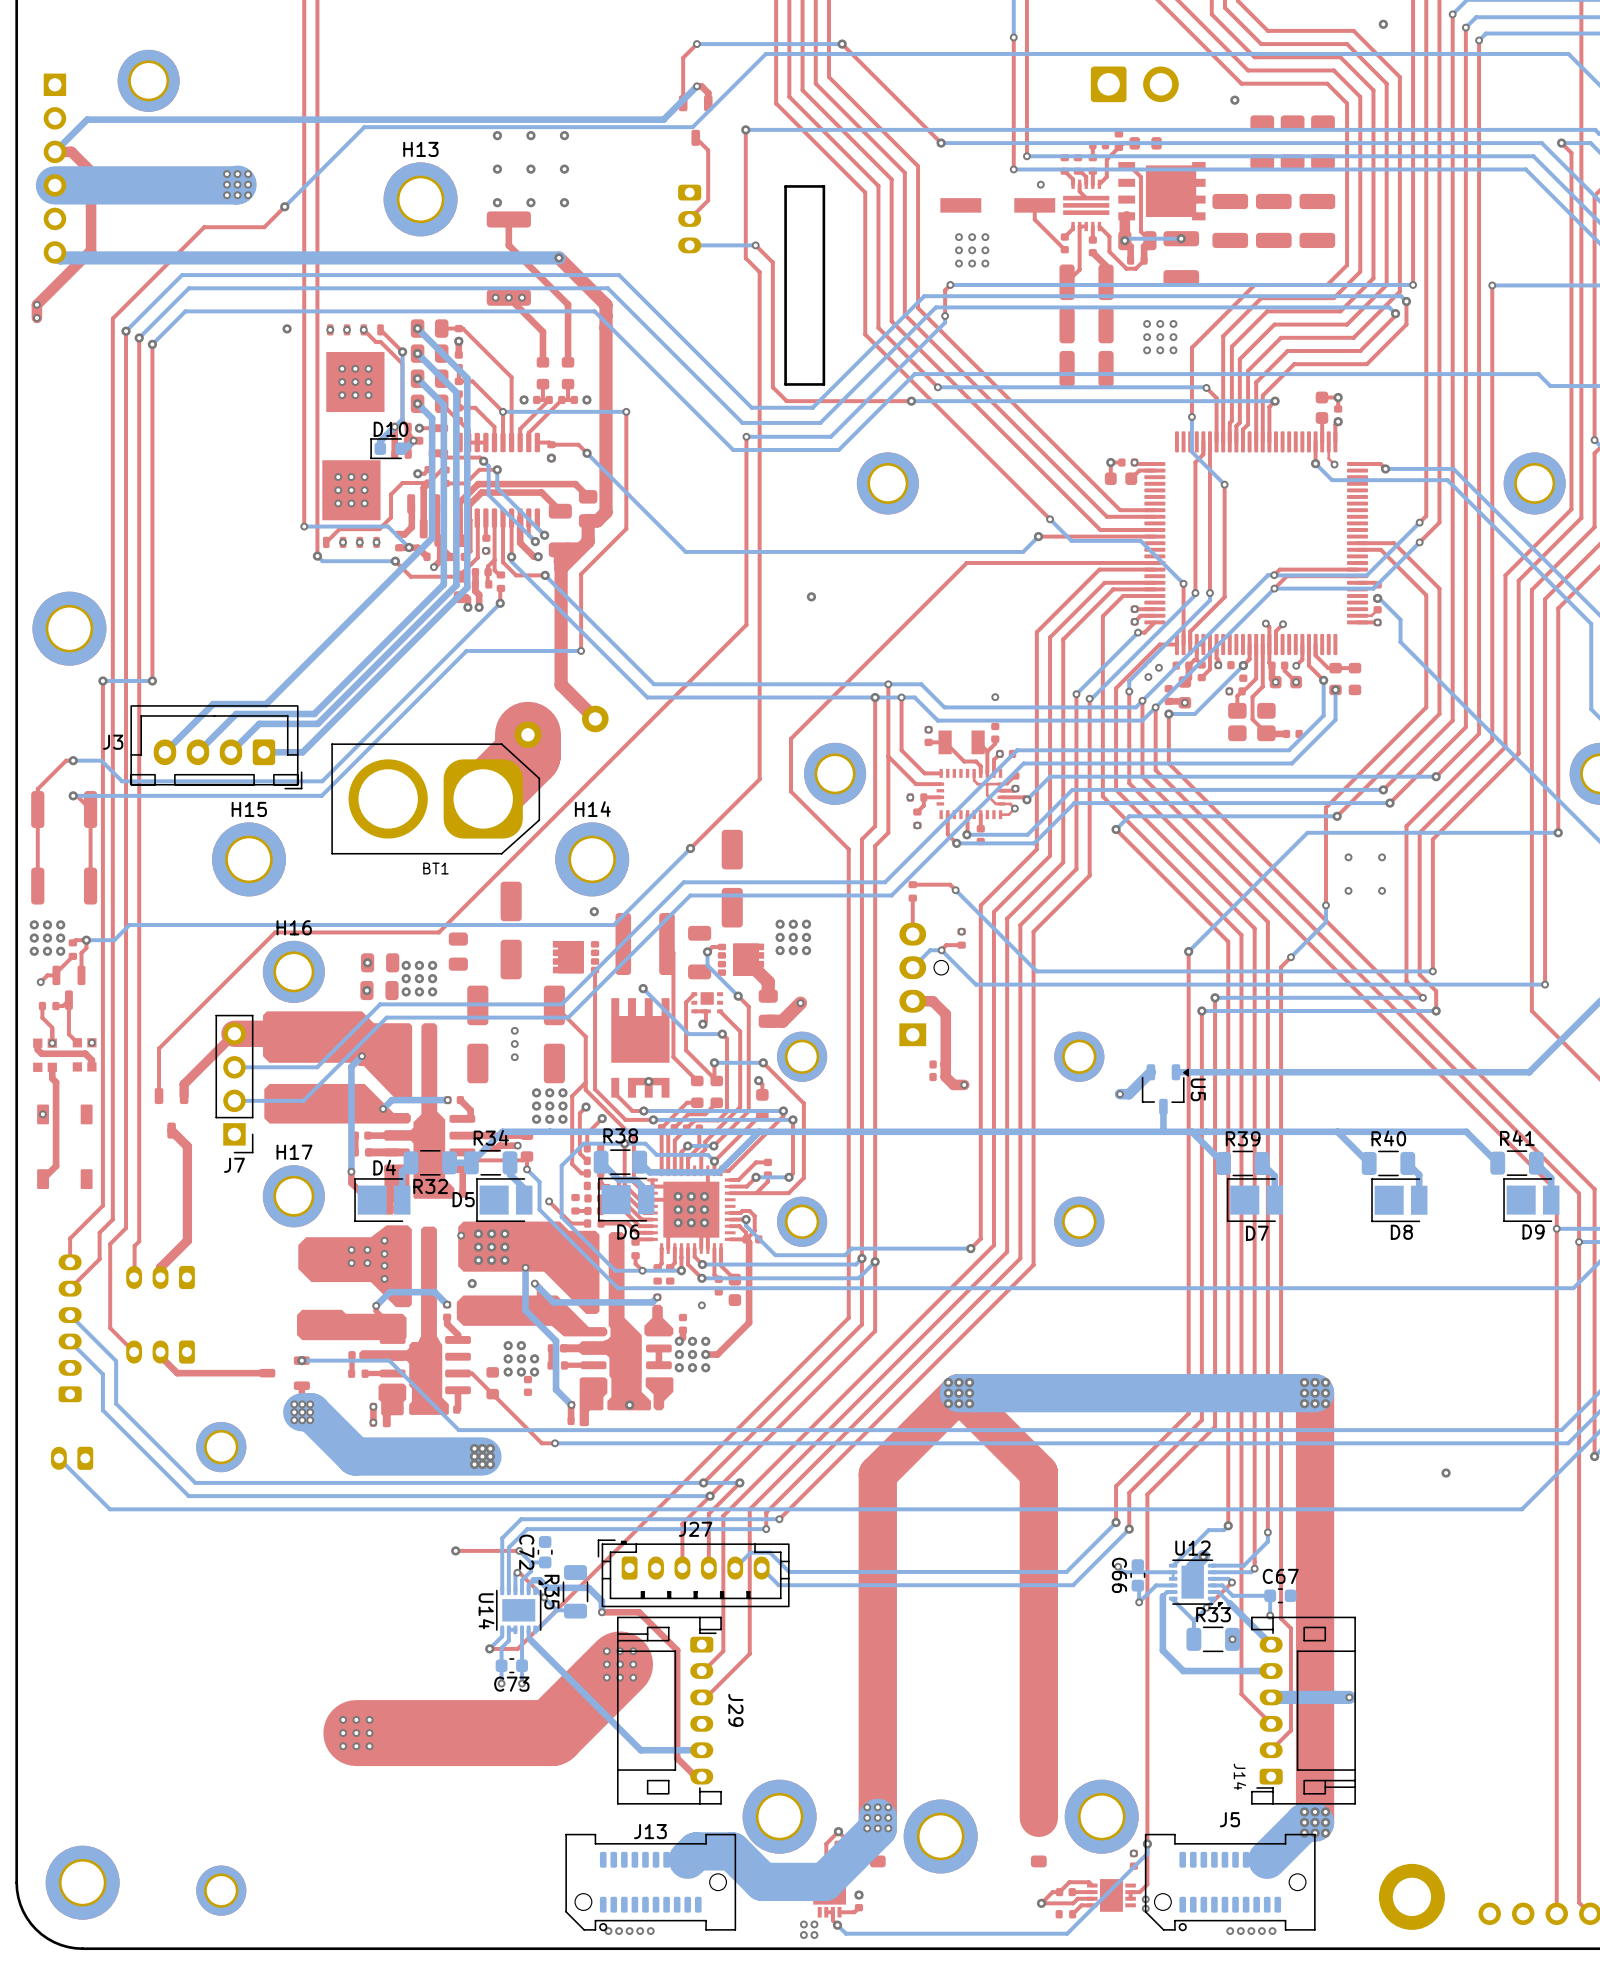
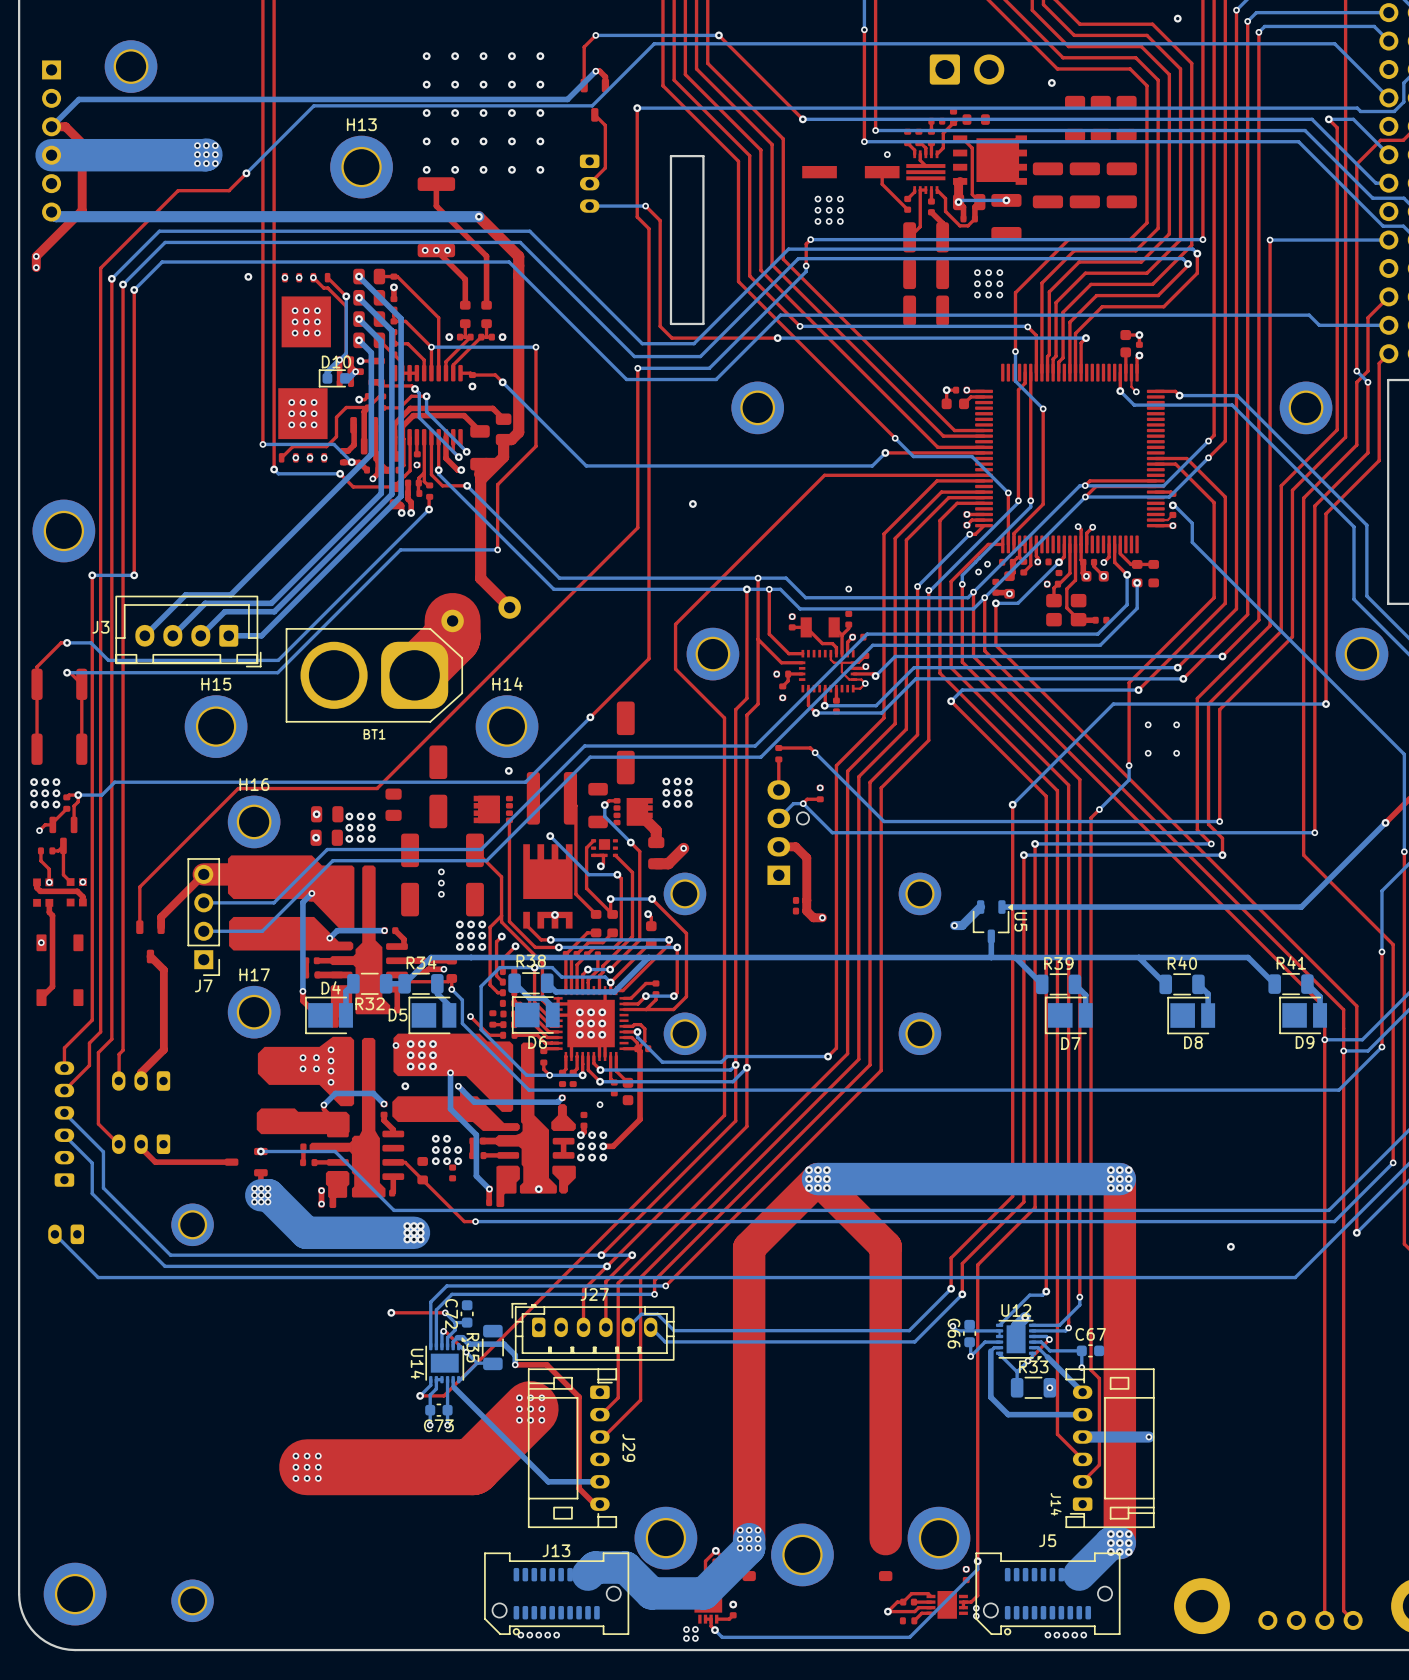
via: none -> (426, 56)
via: none -> (455, 56)
via: none -> (483, 56)
via: none -> (511, 56)
via: none -> (540, 56)
via: none -> (426, 84)
via: none -> (455, 84)
via: none -> (483, 84)
via: none -> (511, 84)
via: none -> (540, 84)
via: none -> (511, 113)
via: none -> (540, 113)
via: none -> (511, 141)
via: none -> (540, 141)
via: none -> (511, 169)
via: none -> (540, 169)

